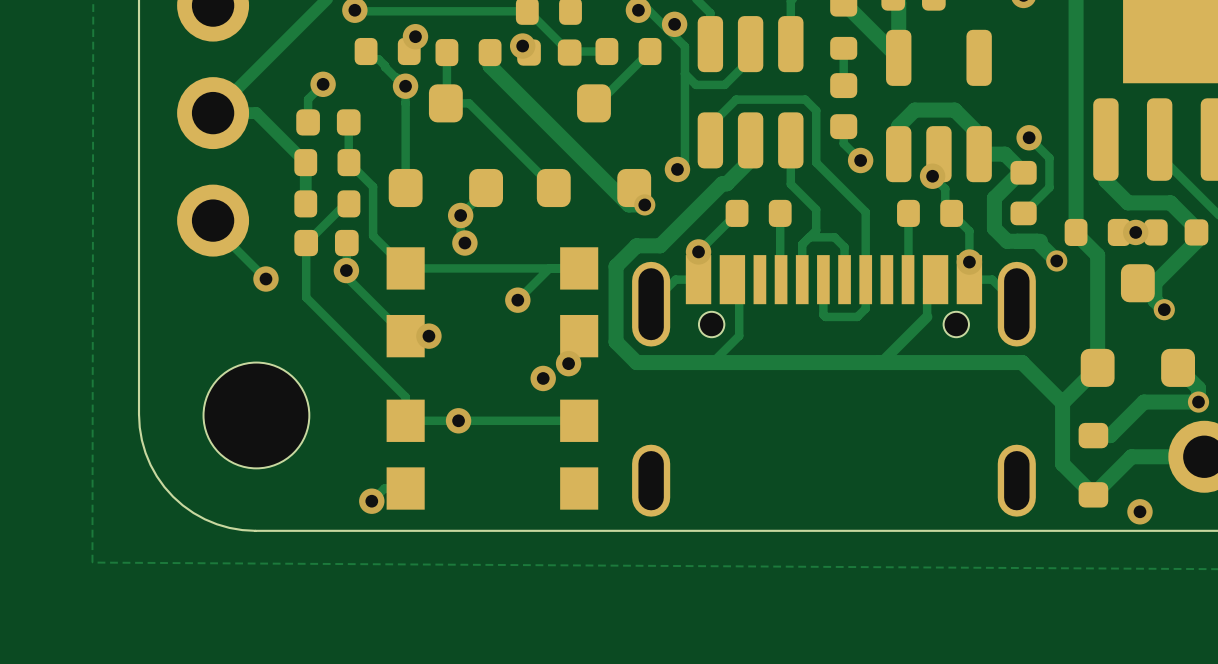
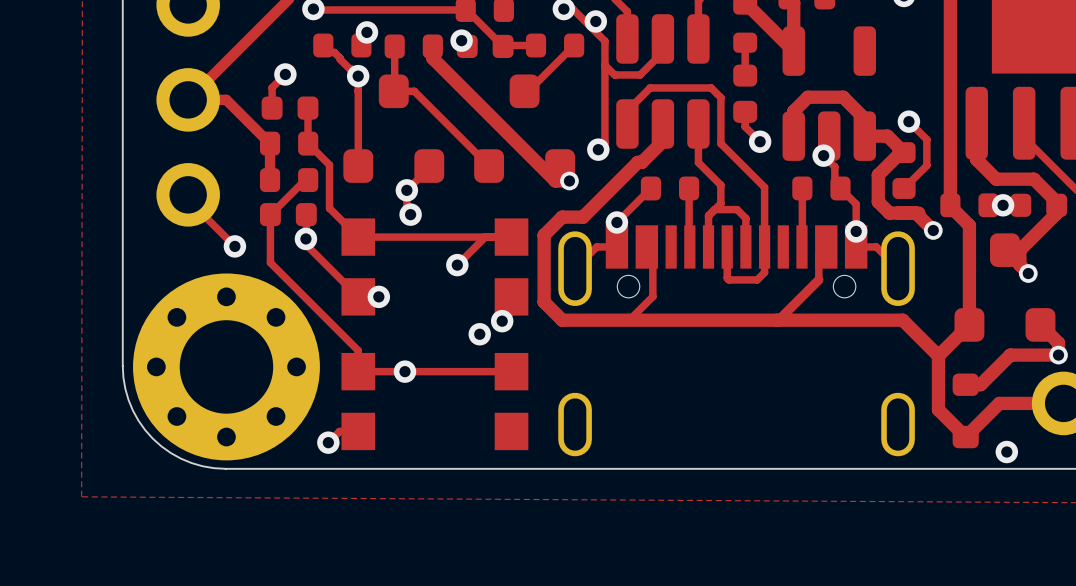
part footprint: [203, 362, 310, 469] -> [133, 273, 320, 461]

